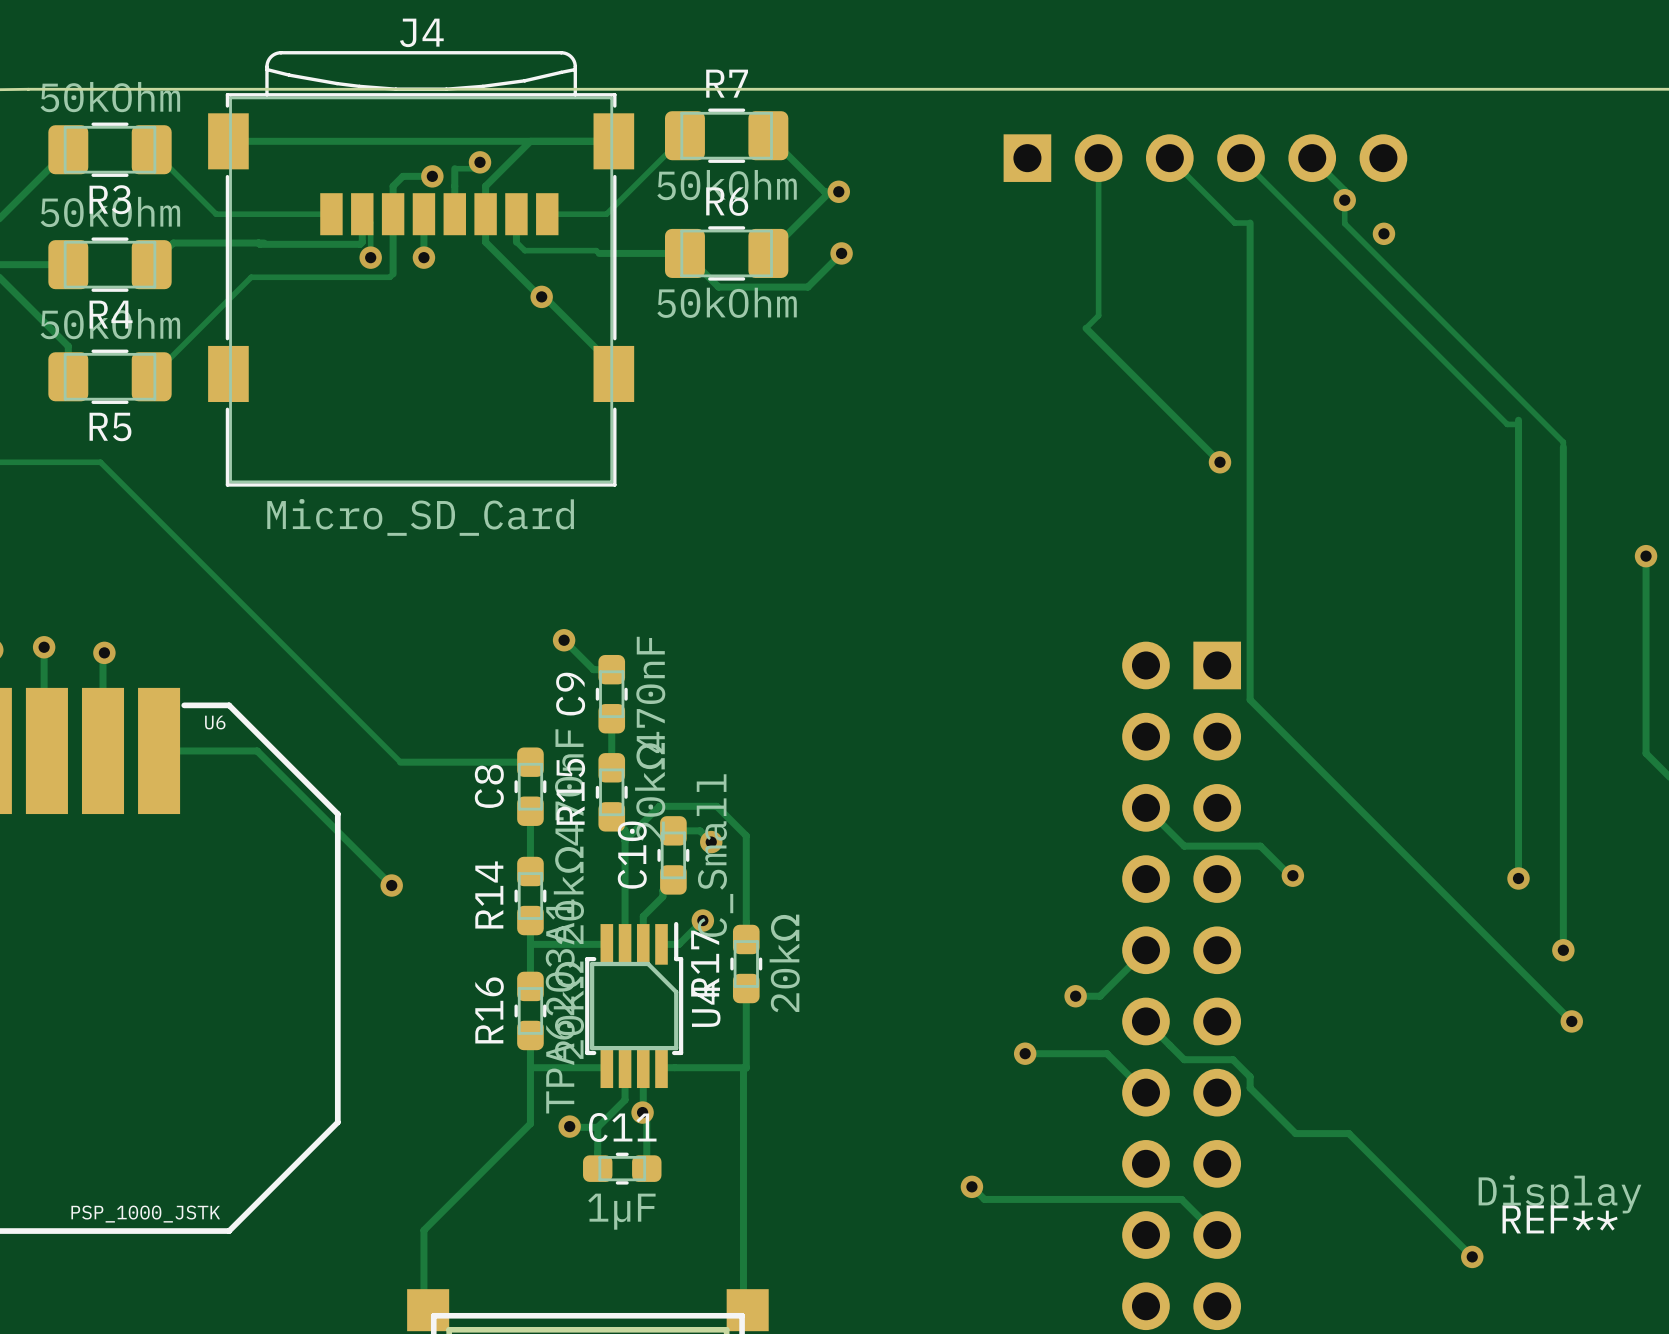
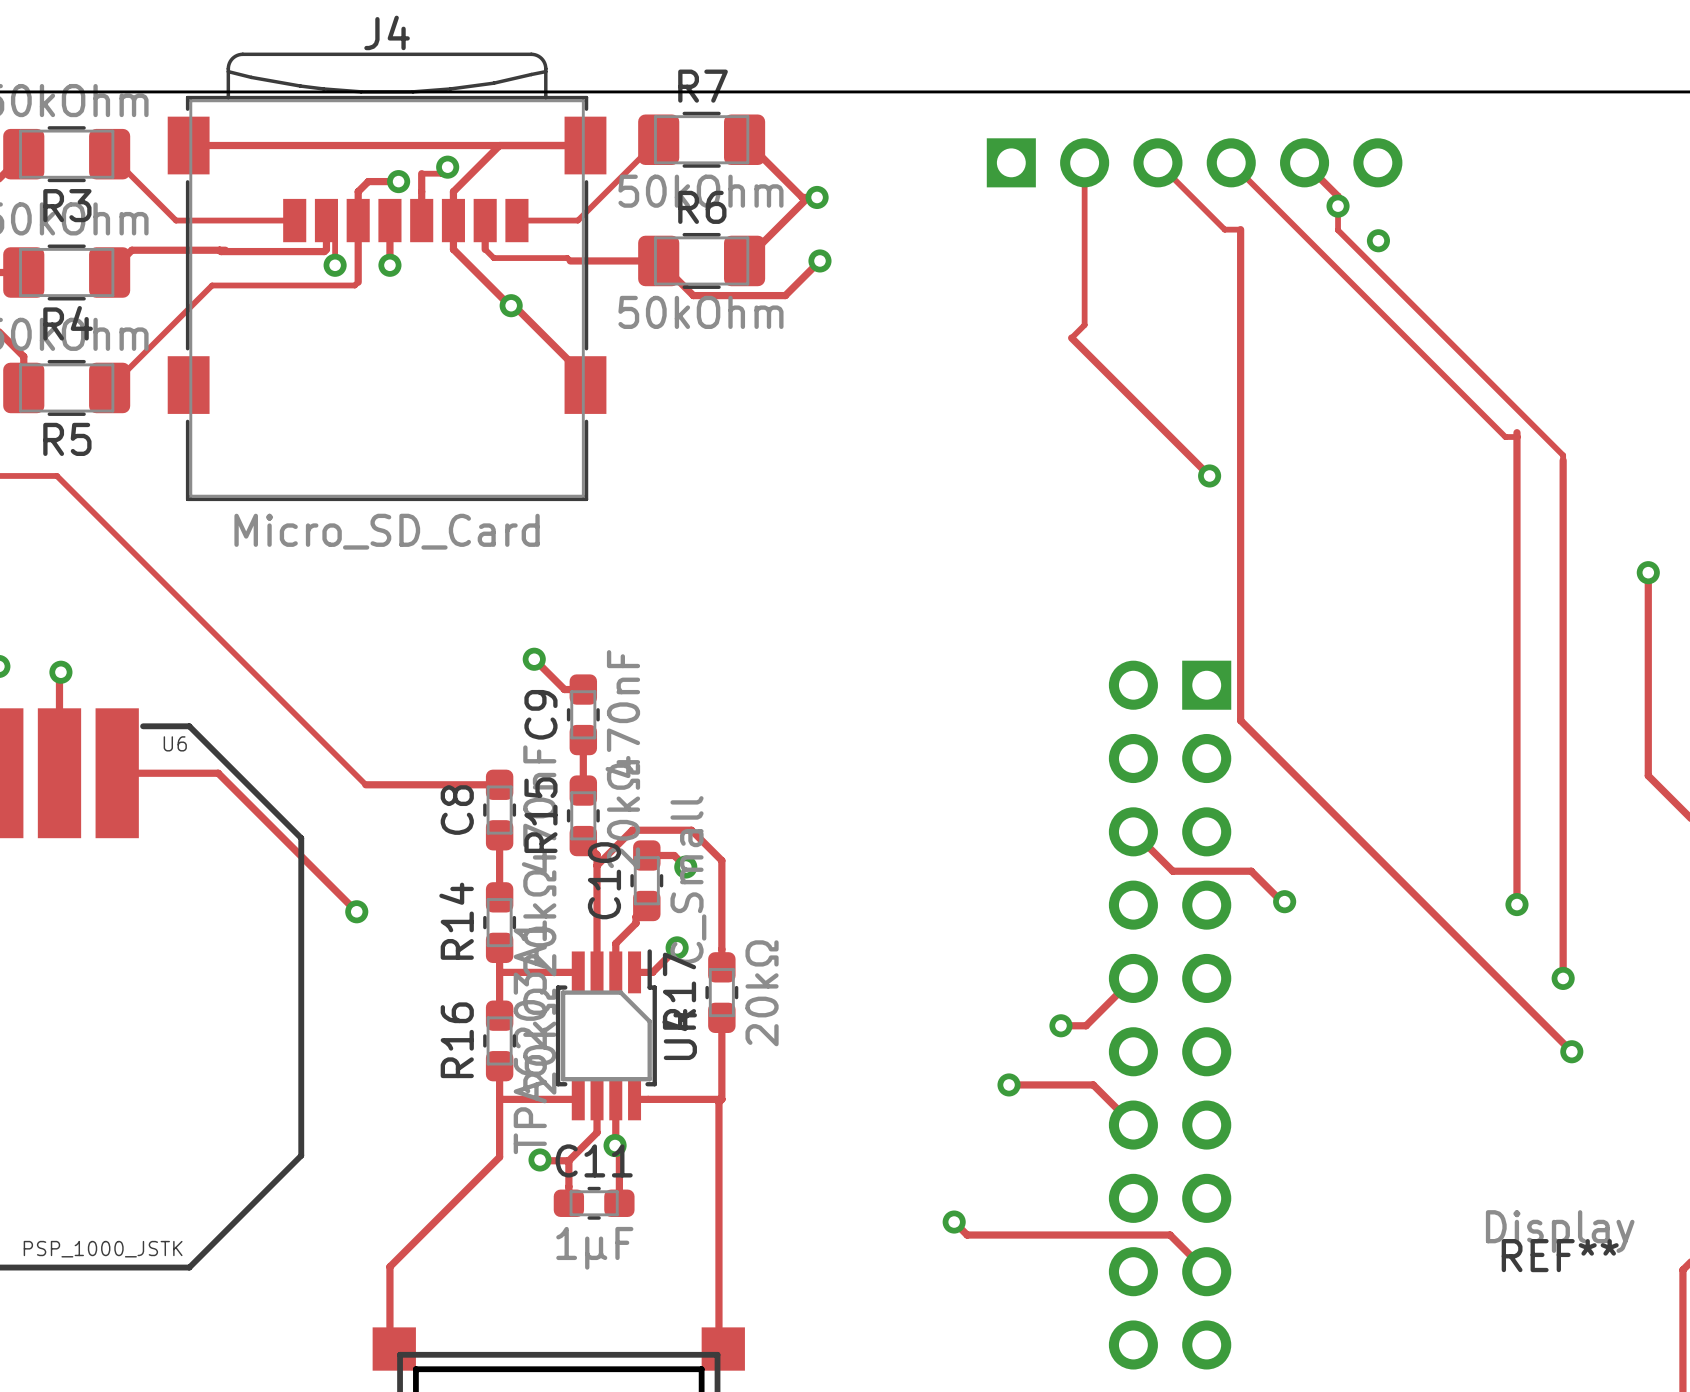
track: (1145, 1021) (1184, 1059) (1233, 1059) (1250, 1076) (1250, 1088) (1295, 1133) (1348, 1133) (1472, 1256) -> none
via: (1472, 1256) -> none

